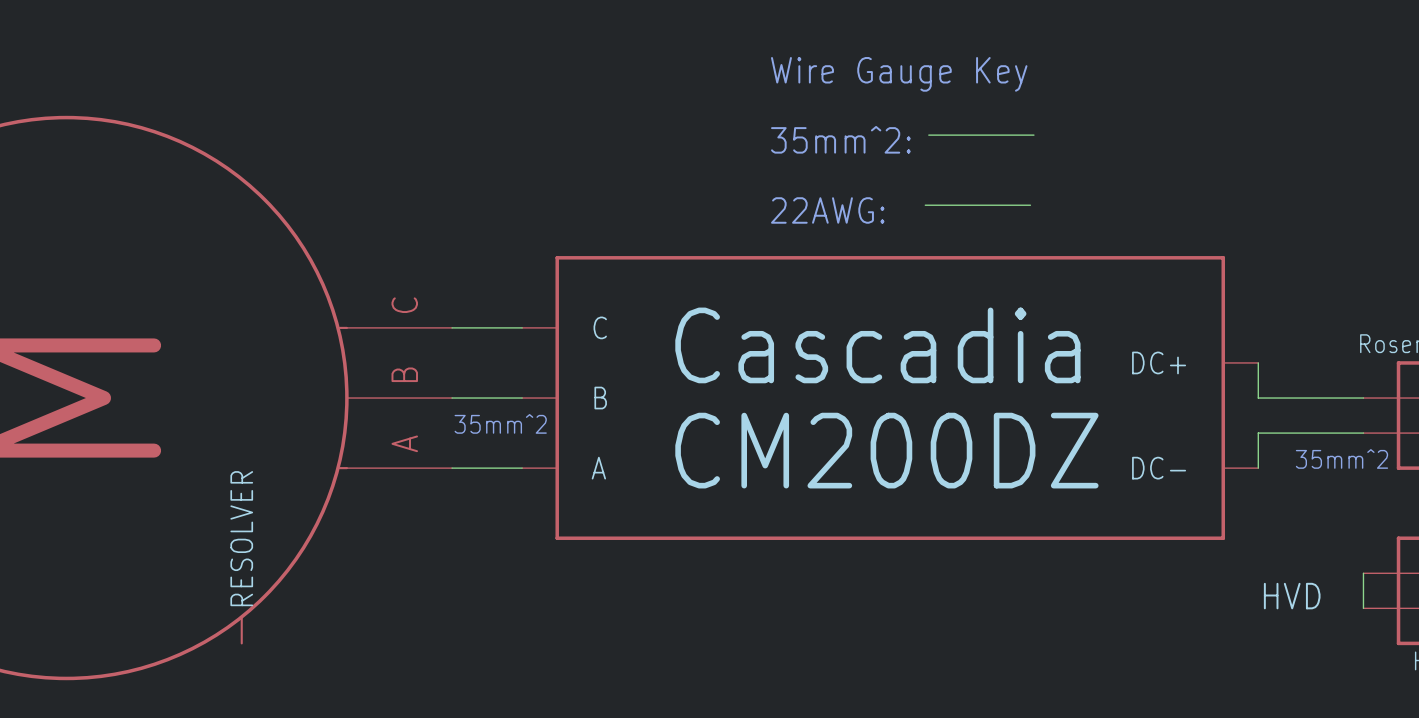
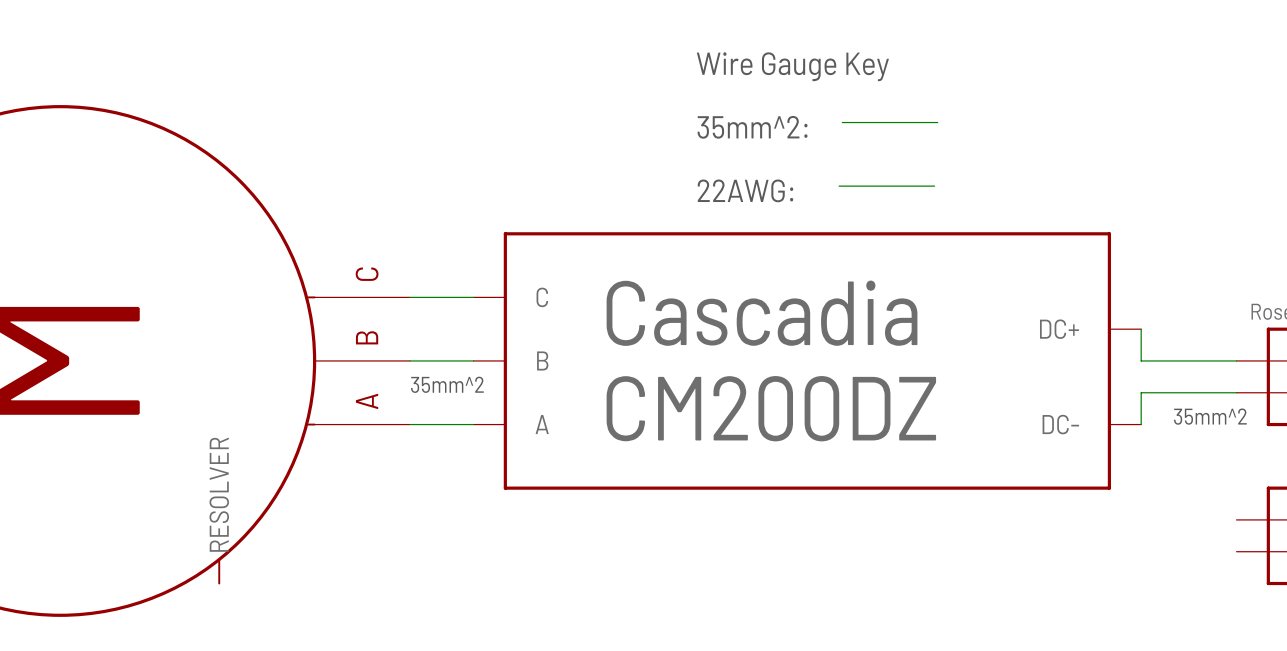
wire: (1363, 573) (1363, 608) -> none
text: HVD (1292, 596) -> none

